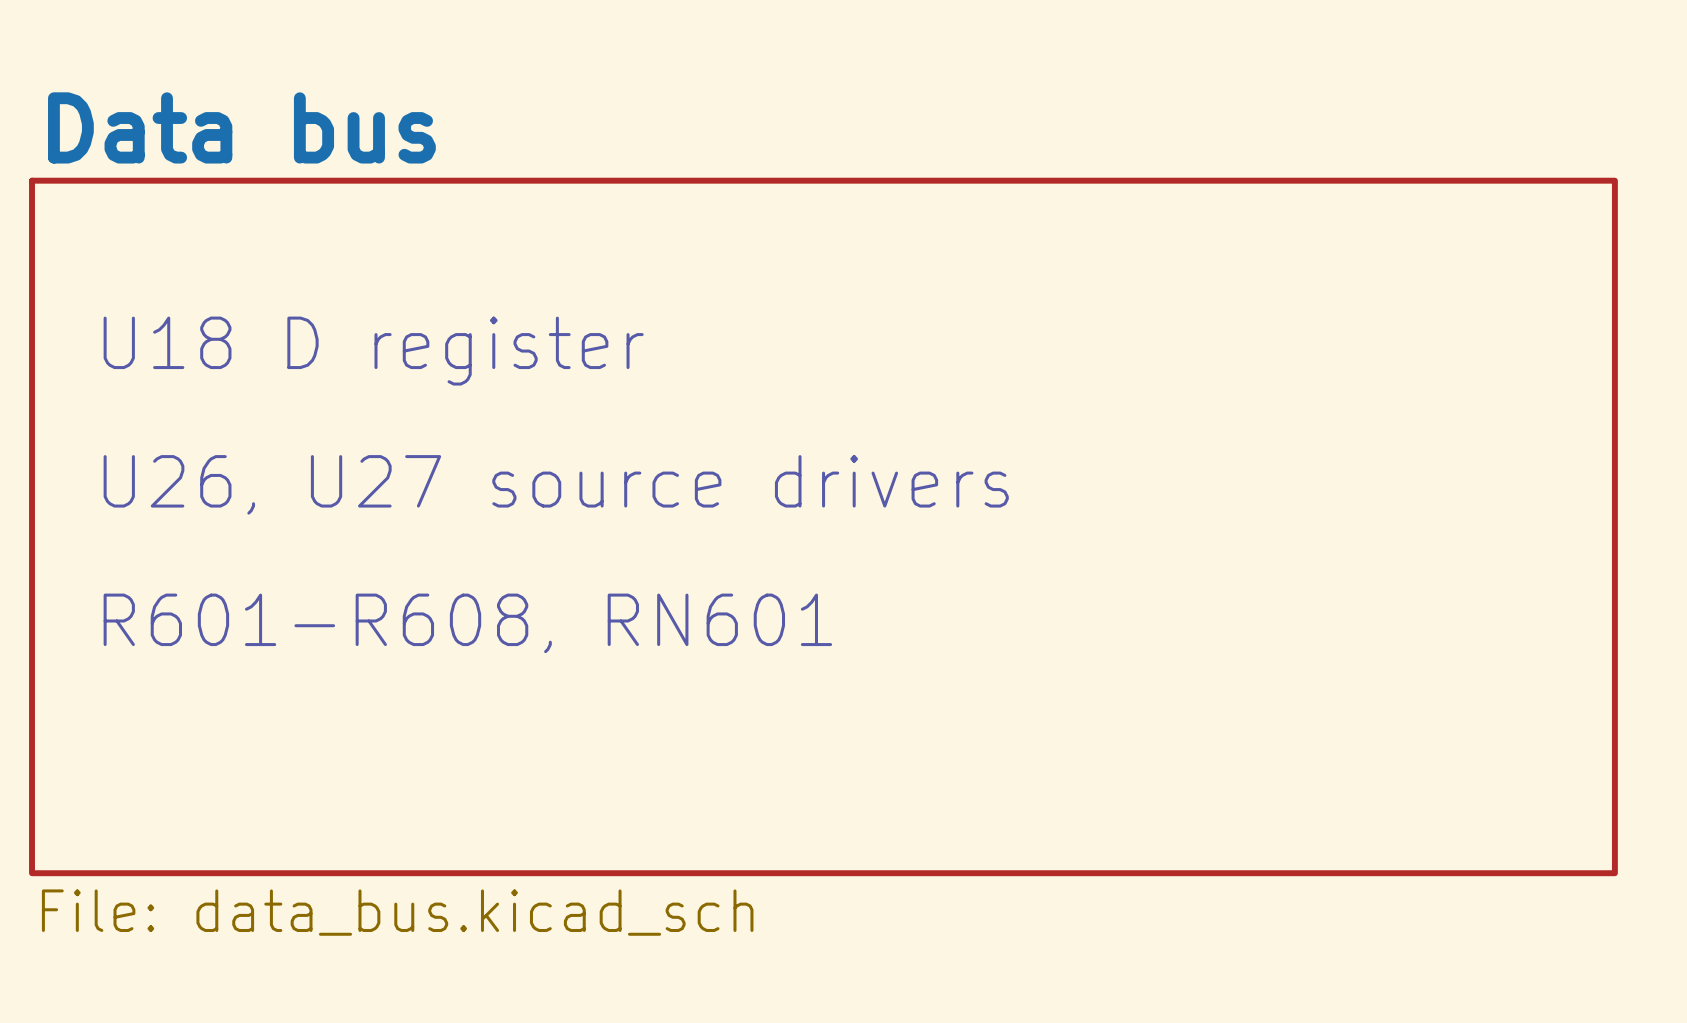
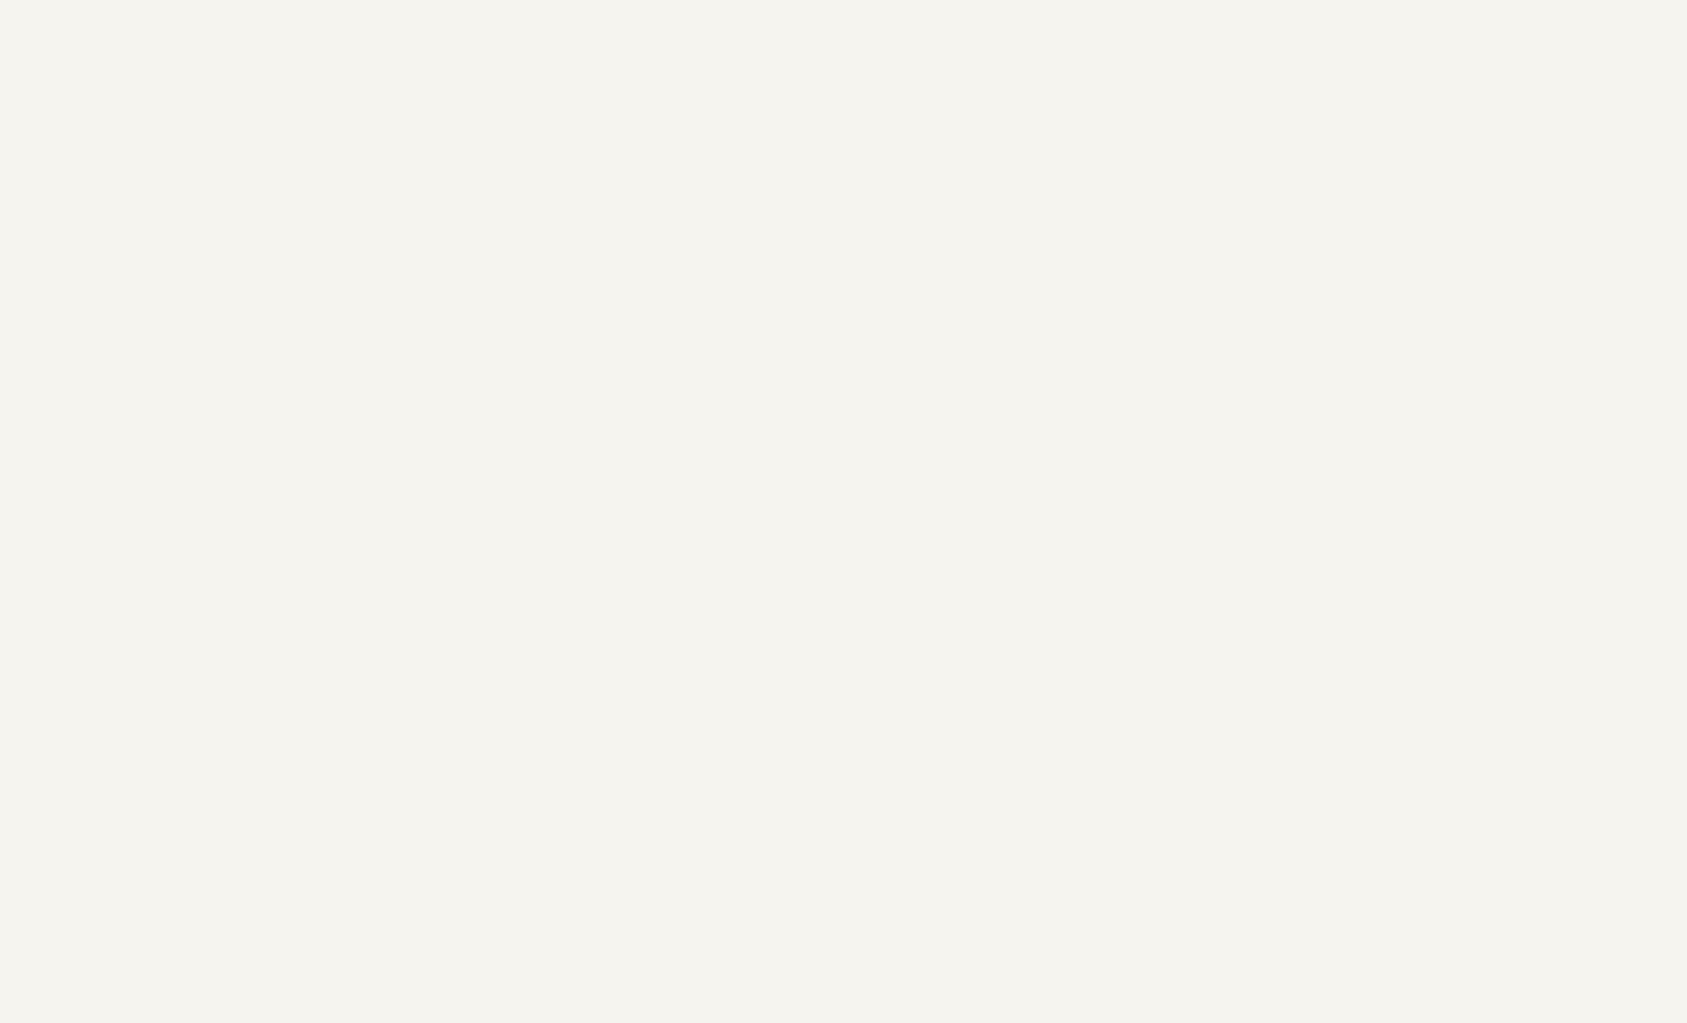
text: U18 D register (373, 351) -> none
text: U26, U27 source drivers (556, 484) -> none
sheet Data bus: File: data_bus.kicad_sch (823, 526) -> none
text: R601-R608, RN601 (467, 623) -> none

